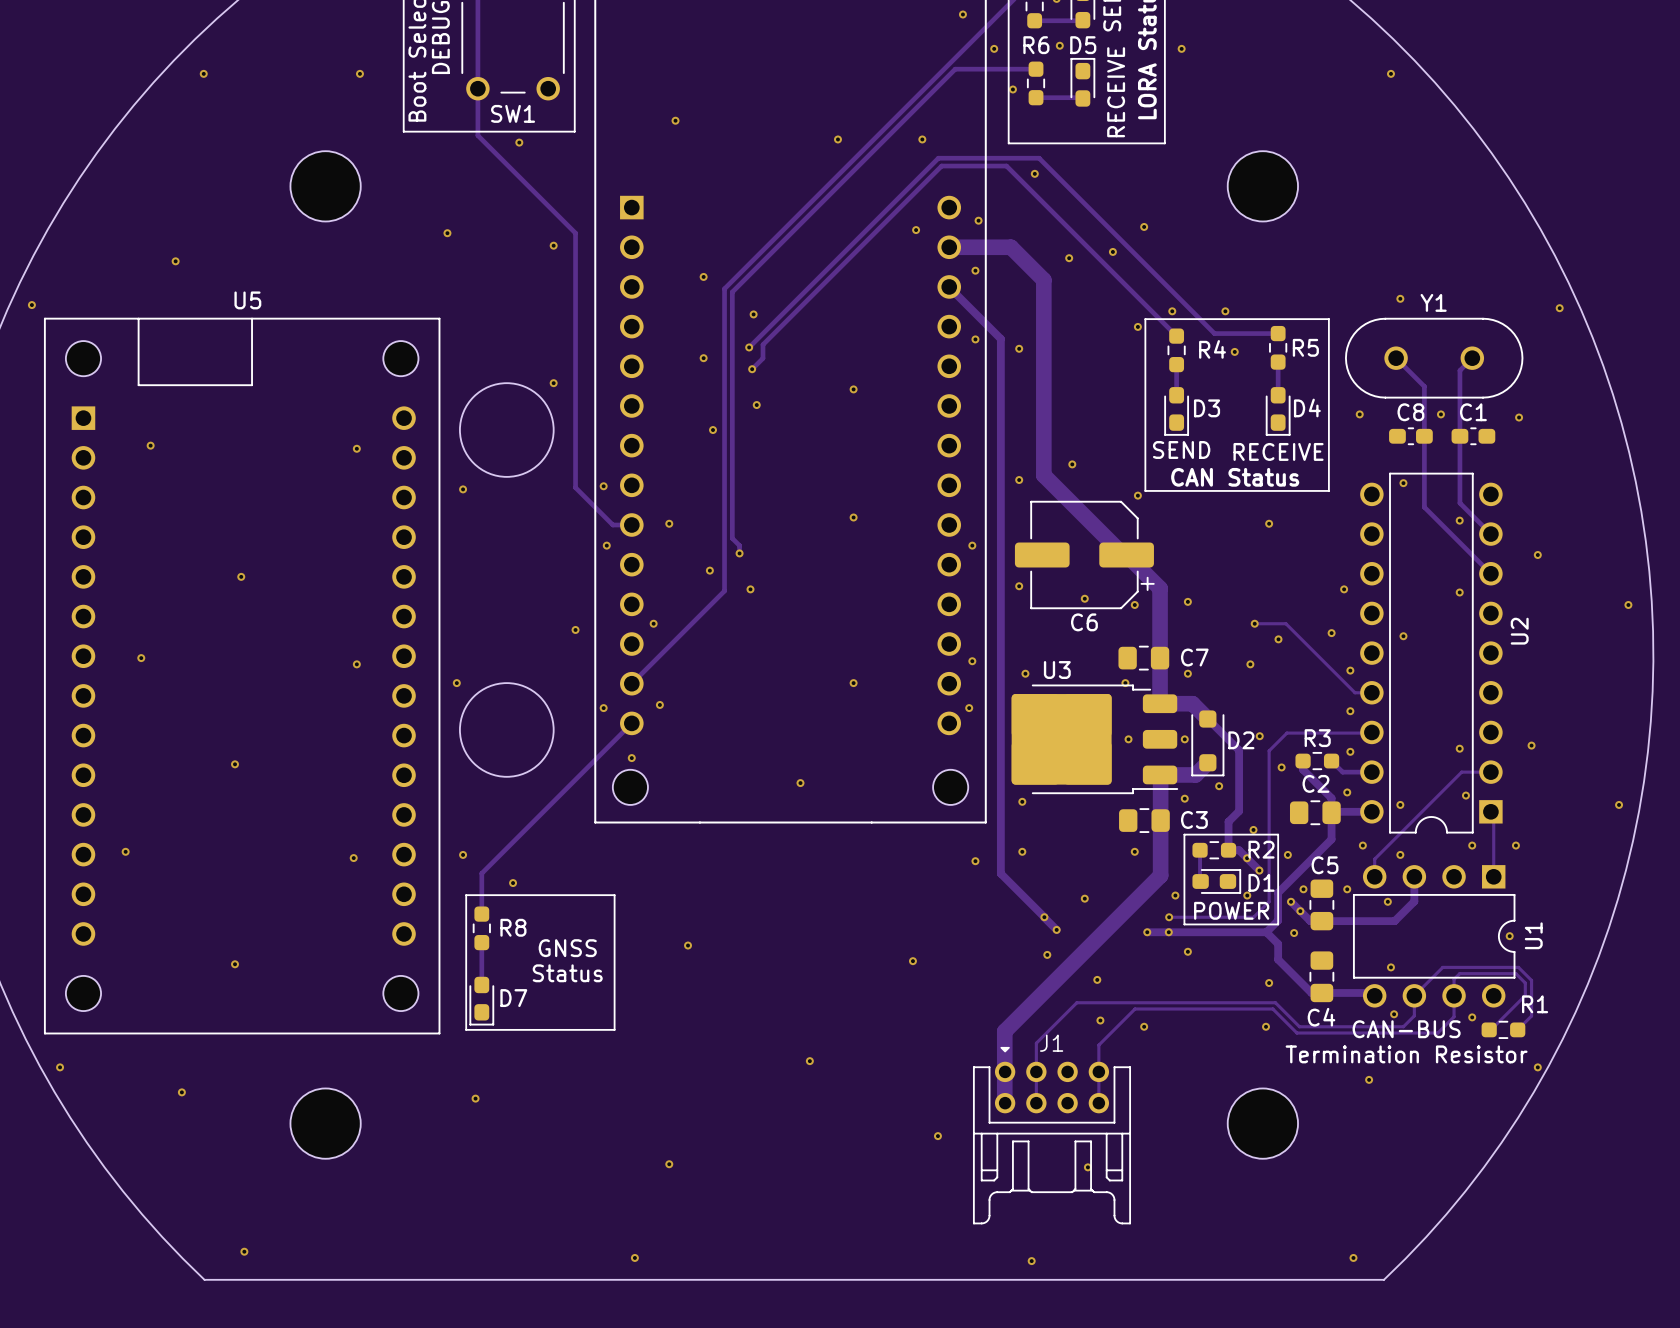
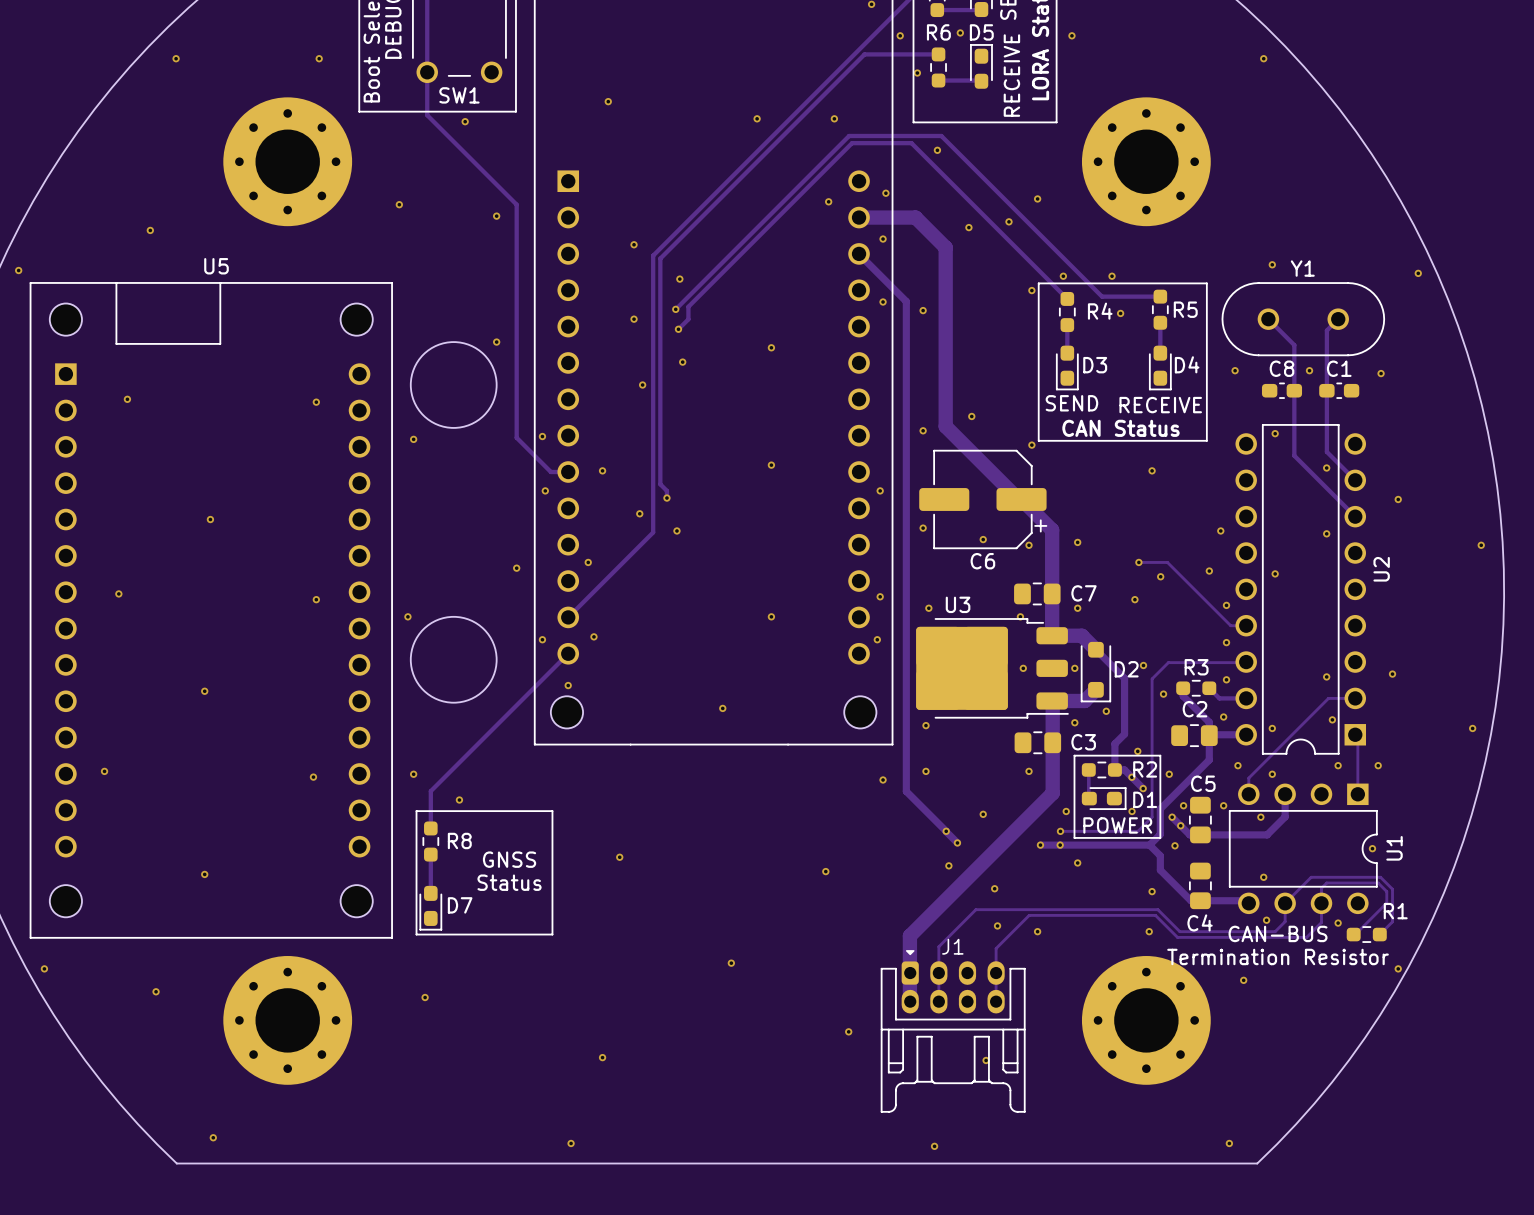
part footprint: [290, 151, 361, 222] -> [223, 97, 353, 227]
part footprint: [1227, 151, 1299, 222] -> [1081, 97, 1211, 227]
J1 footprint: [973, 1046, 1131, 1225] -> [880, 950, 1026, 1113]
part footprint: [290, 1088, 361, 1159] -> [223, 956, 353, 1085]
part footprint: [1227, 1088, 1299, 1159] -> [1081, 956, 1211, 1085]

